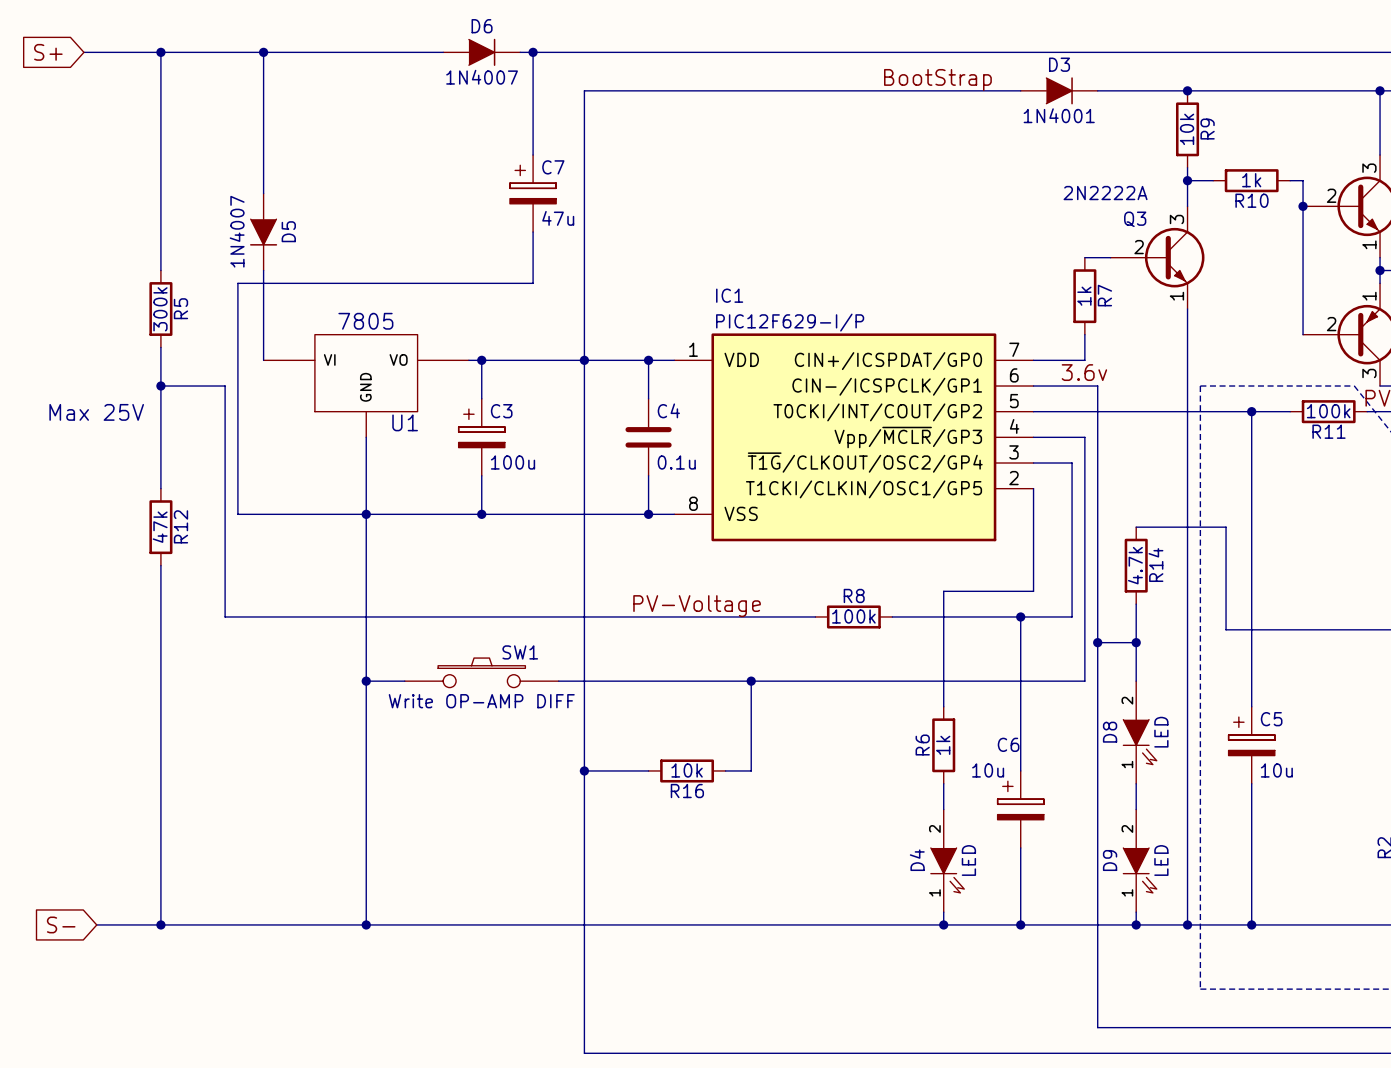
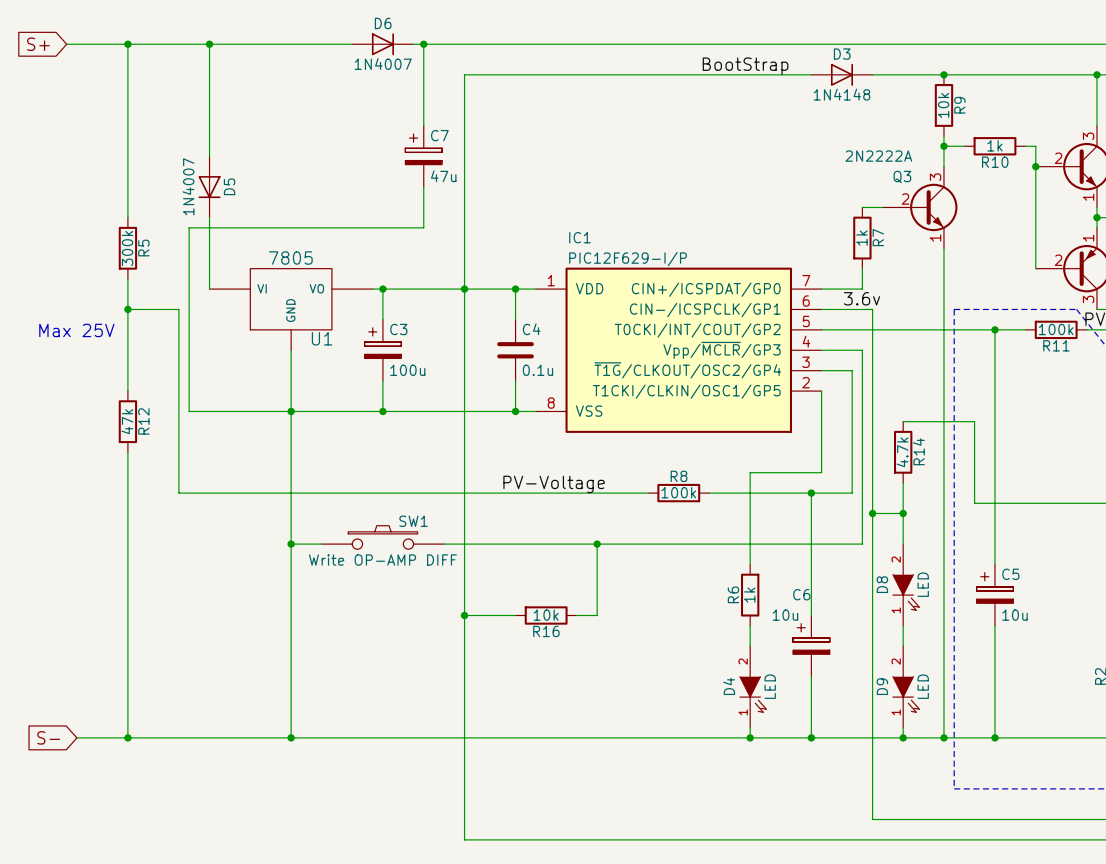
D6 symbol: [443, 38, 521, 66] -> [352, 33, 414, 56]
D3 symbol: [1020, 77, 1098, 105] -> [811, 63, 873, 86]
D3 value: 1N4001 (1059, 115) -> 1N4148 (841, 94)
D5 symbol: [249, 193, 278, 271] -> [198, 156, 221, 218]

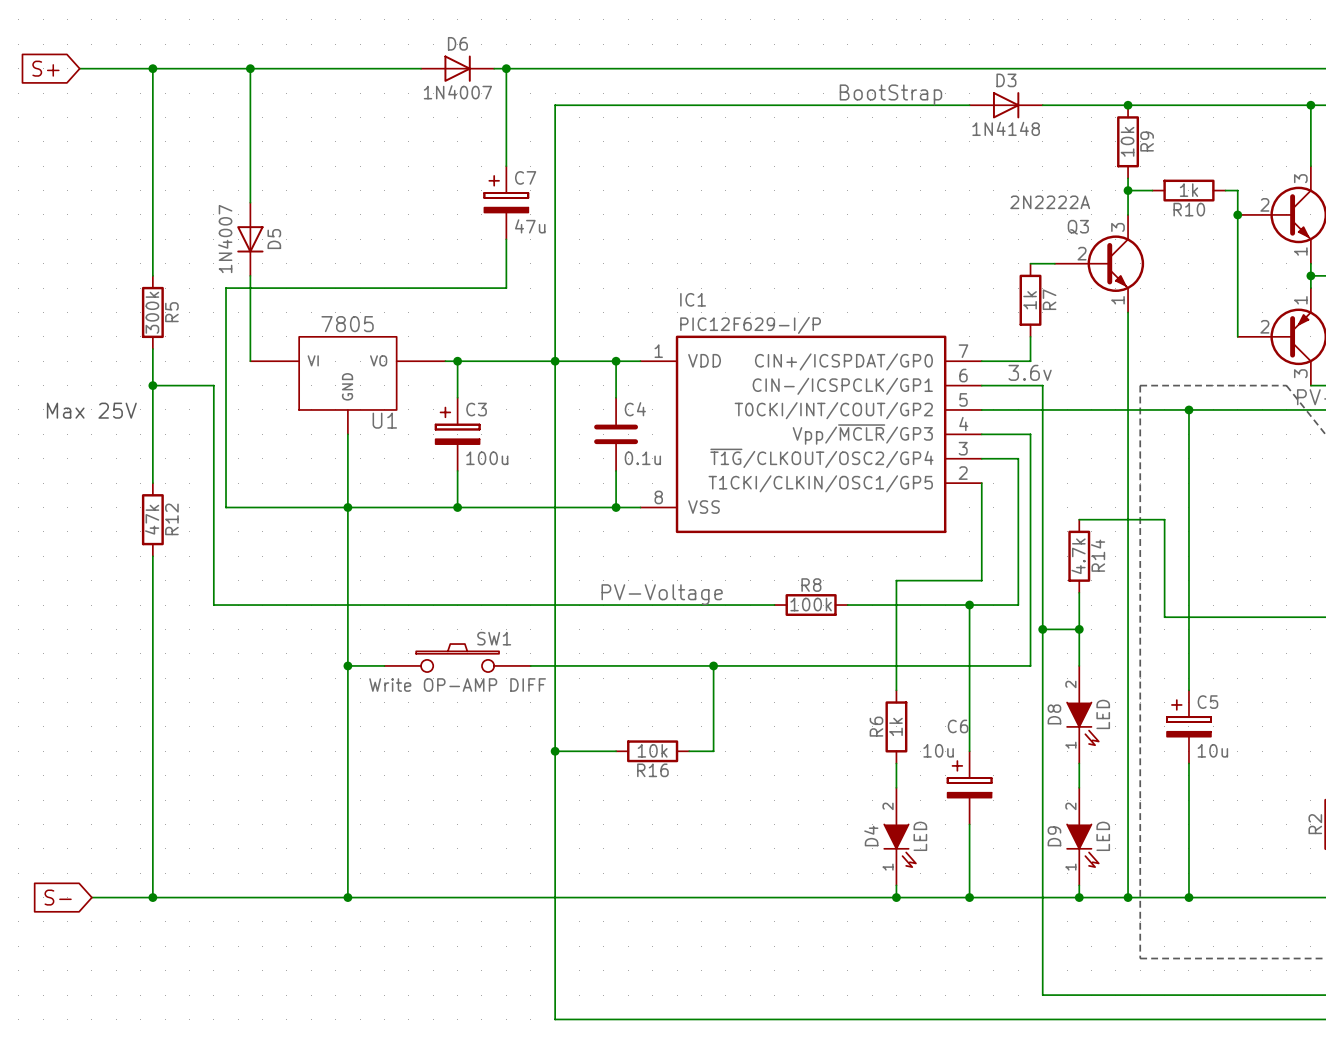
R11: 100k (1056, 329) -> none

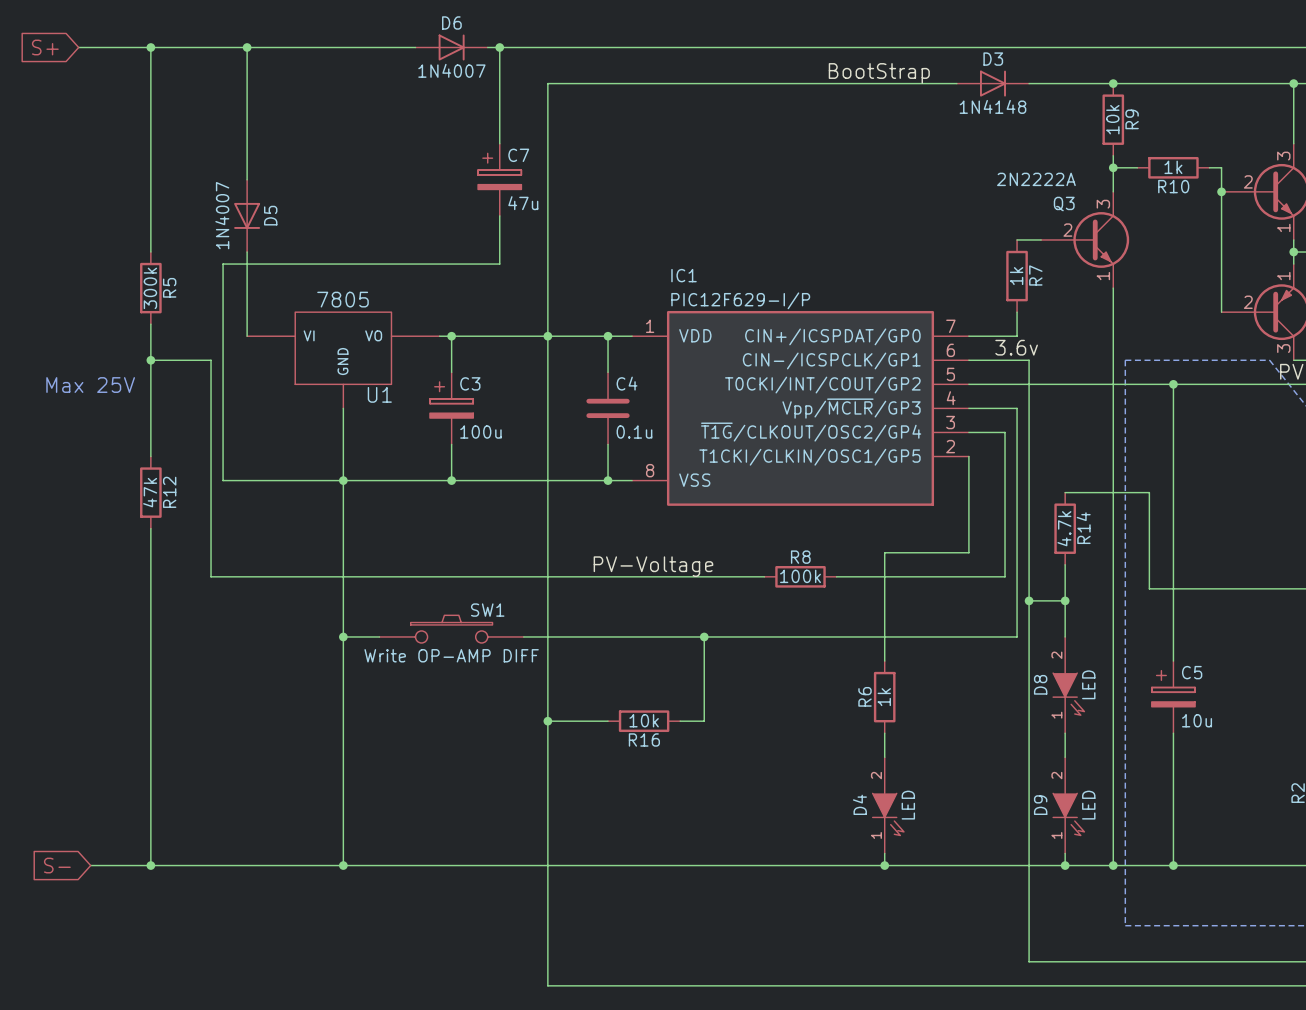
wire: (969, 605) (969, 751) -> none
junction: (969, 605) -> none
C6: 10u (969, 787) -> none
wire: (969, 824) (969, 897) -> none
junction: (969, 897) -> none

